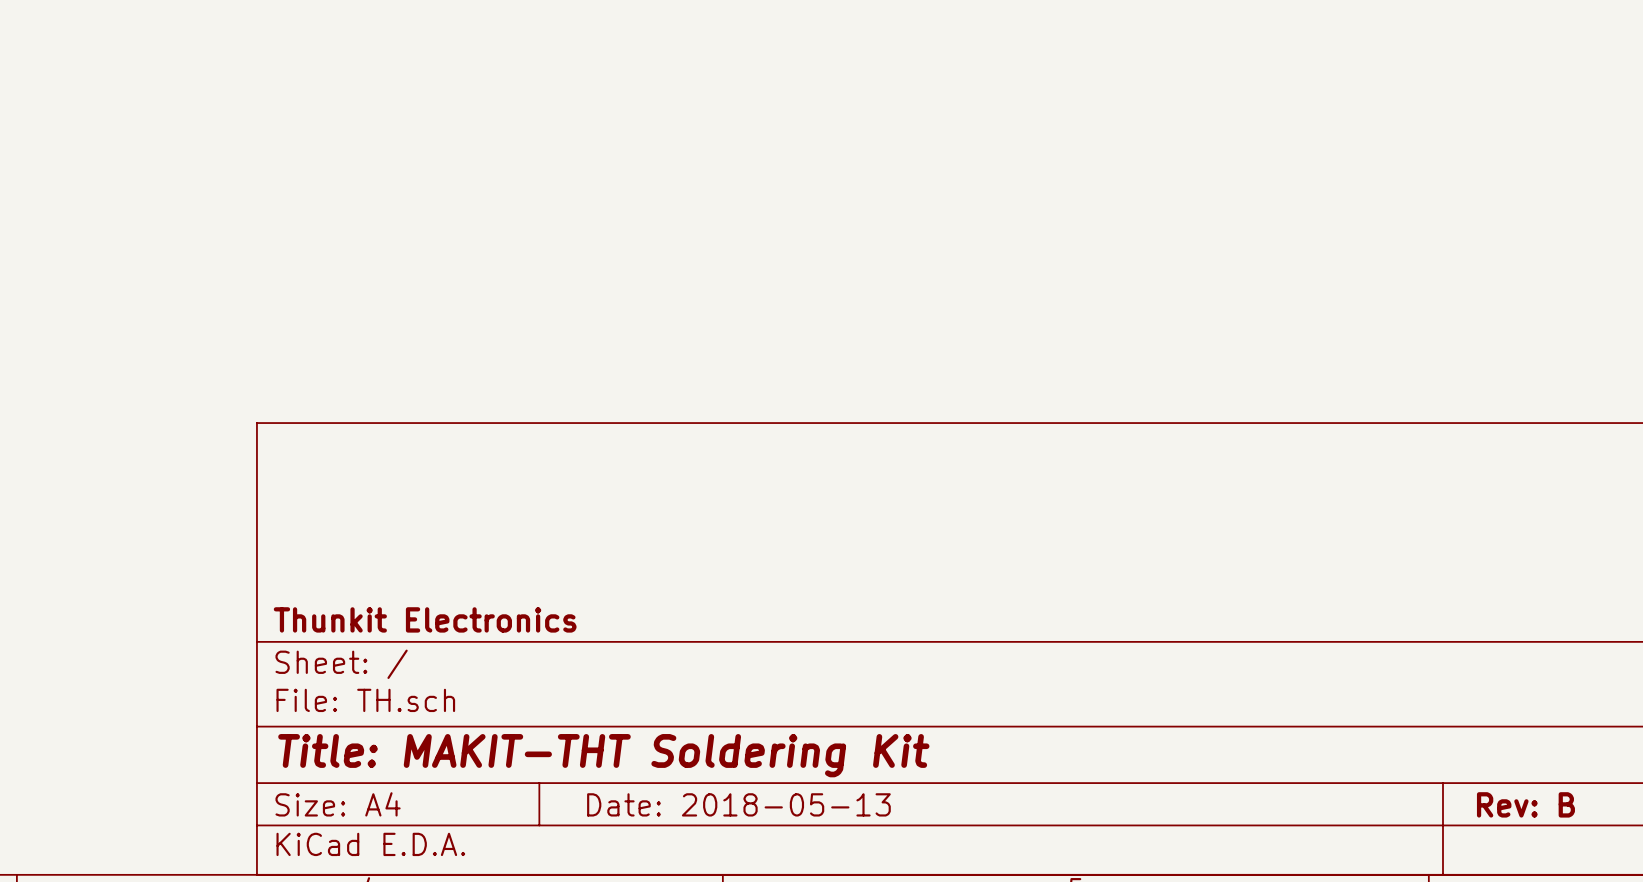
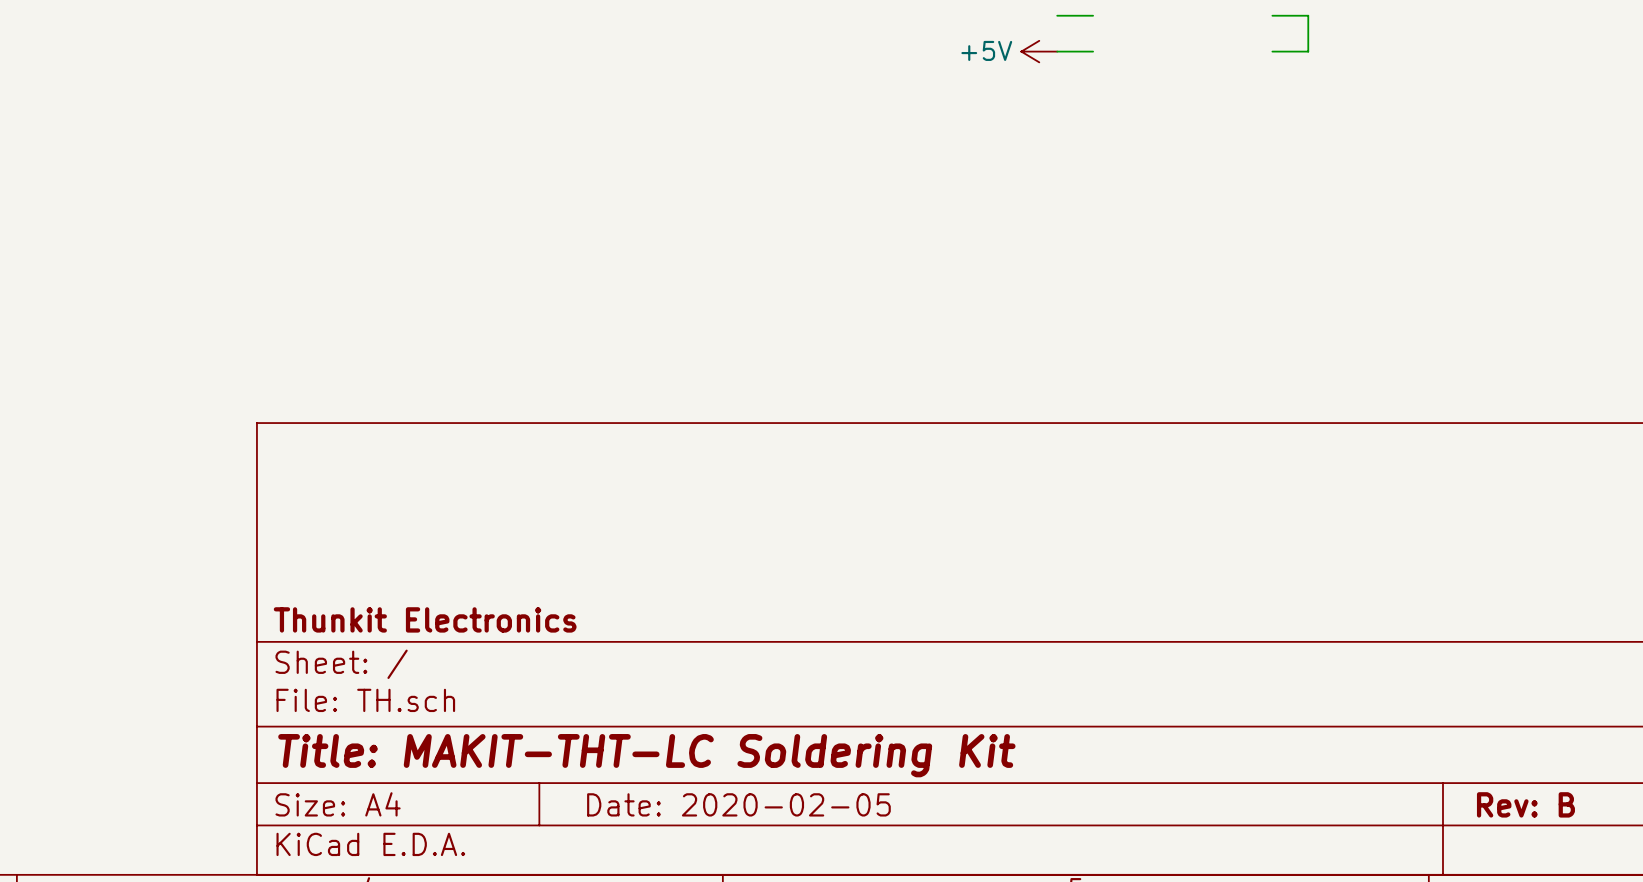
wire: none -> (1057, 15) (1093, 15)
wire: none -> (1272, 15) (1308, 15) (1308, 51) (1272, 51)
power symbol: none -> +5V (1039, 51)
wire: none -> (1057, 51) (1093, 51)
title block: Title: MAKIT-THT Soldering Kit (603, 755) -> Title: MAKIT-THT-LC Soldering Kit (646, 755)
title block: Date: 2018-05-13 (738, 804) -> Date: 2020-02-05 (738, 804)

